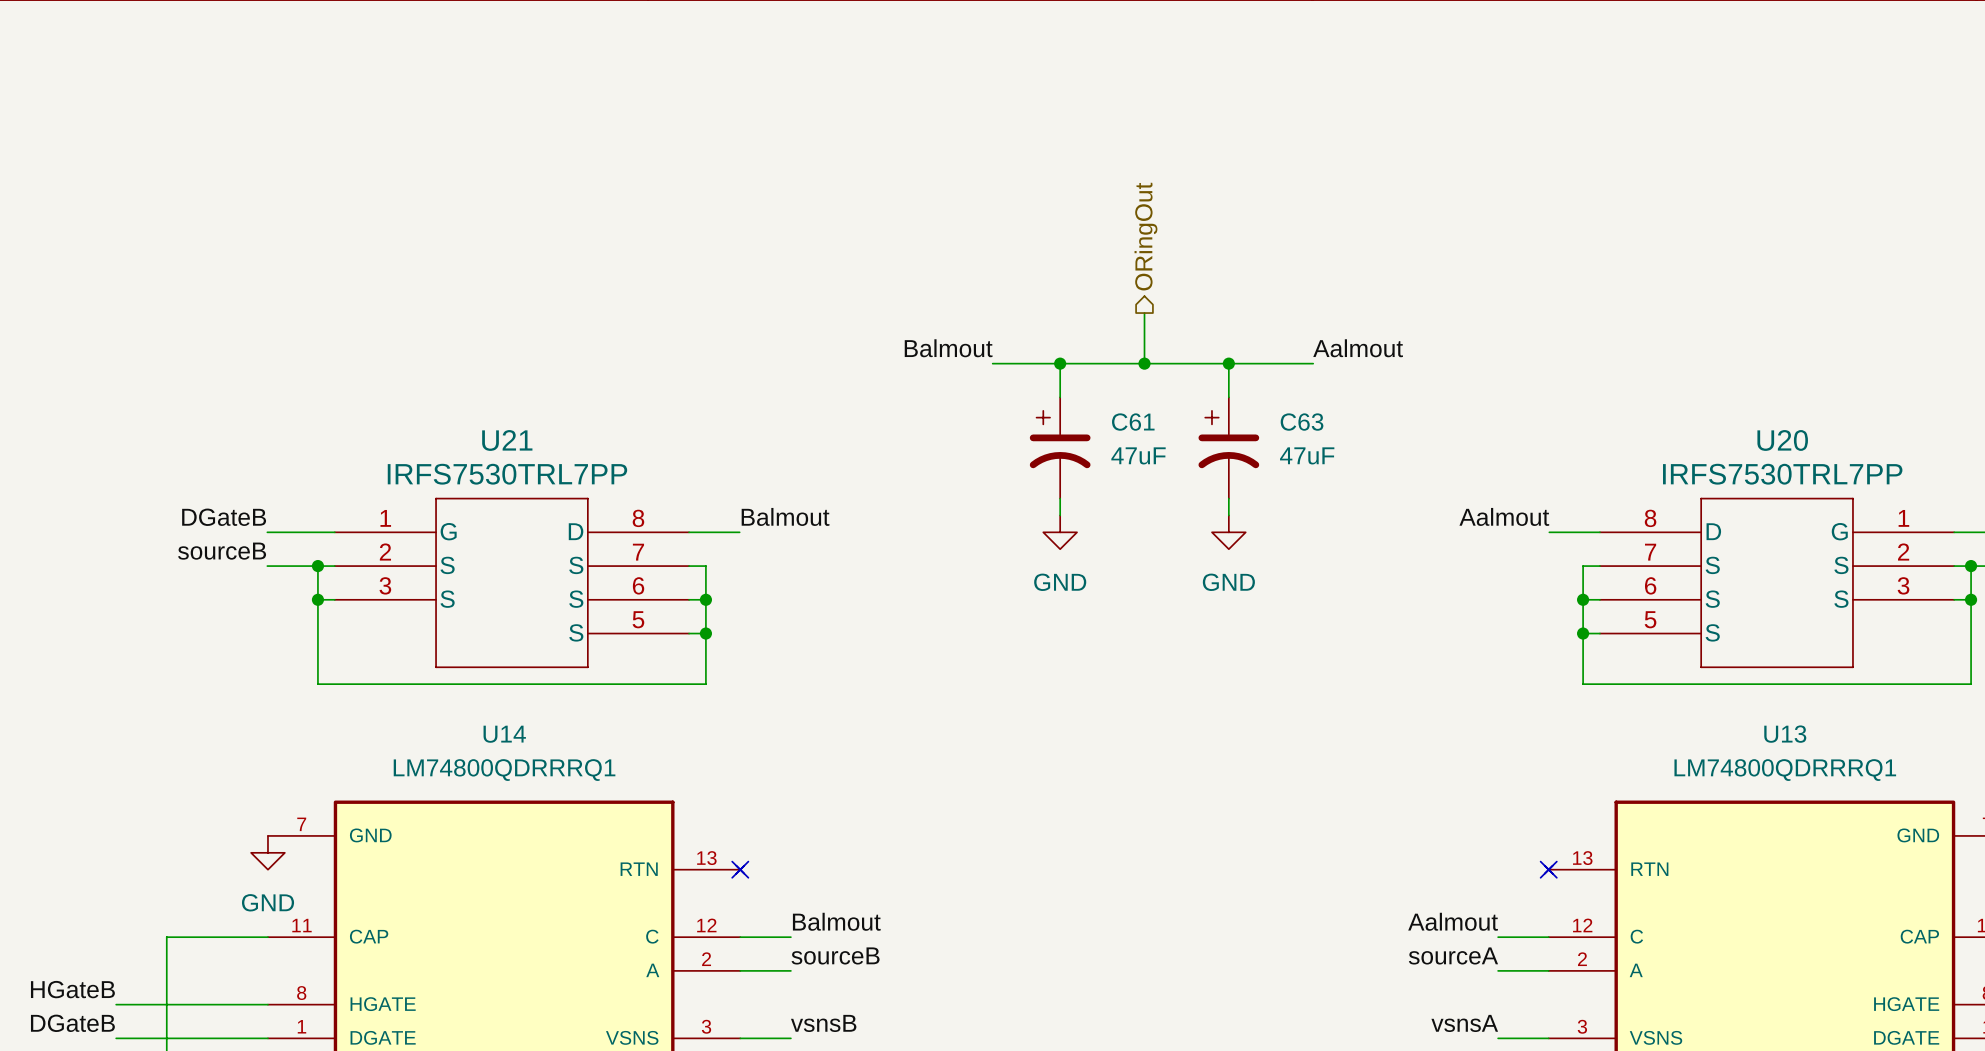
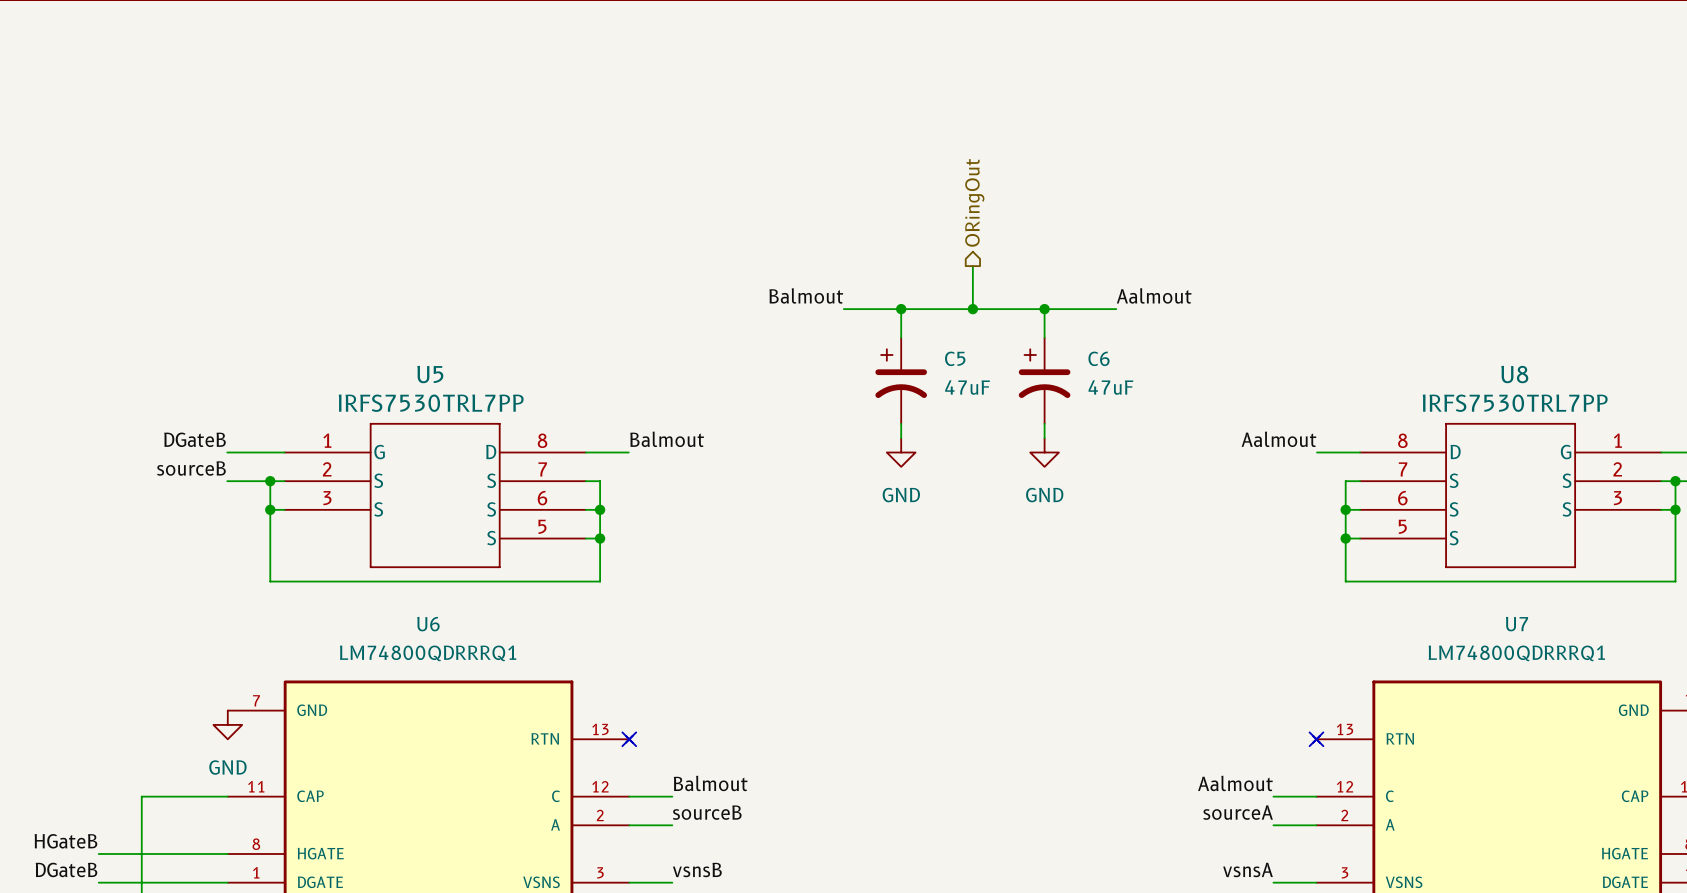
C61 name: C61 (1133, 422) -> C5 (955, 358)
C63 name: C63 (1302, 422) -> C6 (1098, 358)
U21 name: U21 (507, 440) -> U5 (430, 374)
U20 name: U20 (1782, 440) -> U8 (1514, 374)
U14 name: U14 (504, 734) -> U6 (428, 624)
U13 name: U13 (1785, 734) -> U7 (1516, 624)

